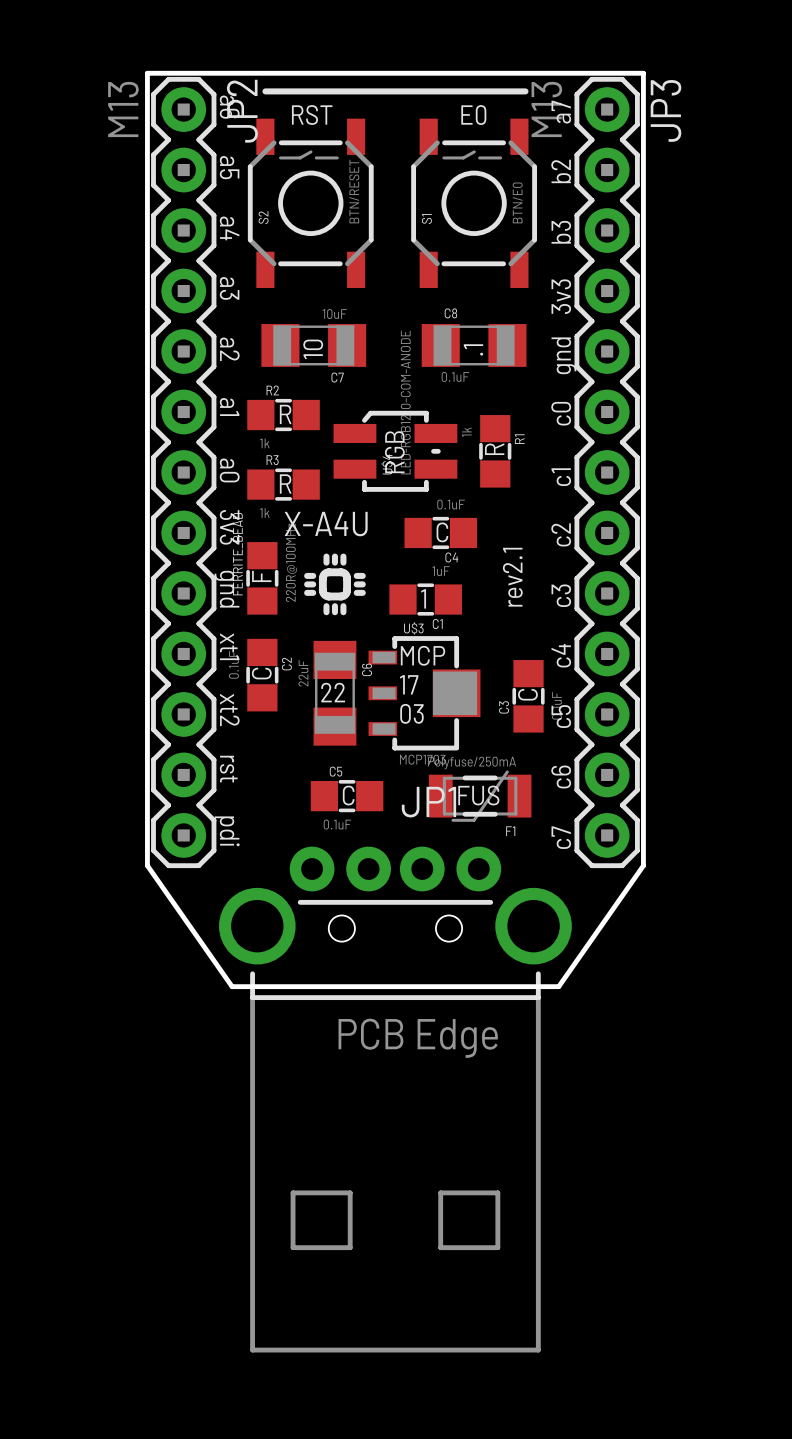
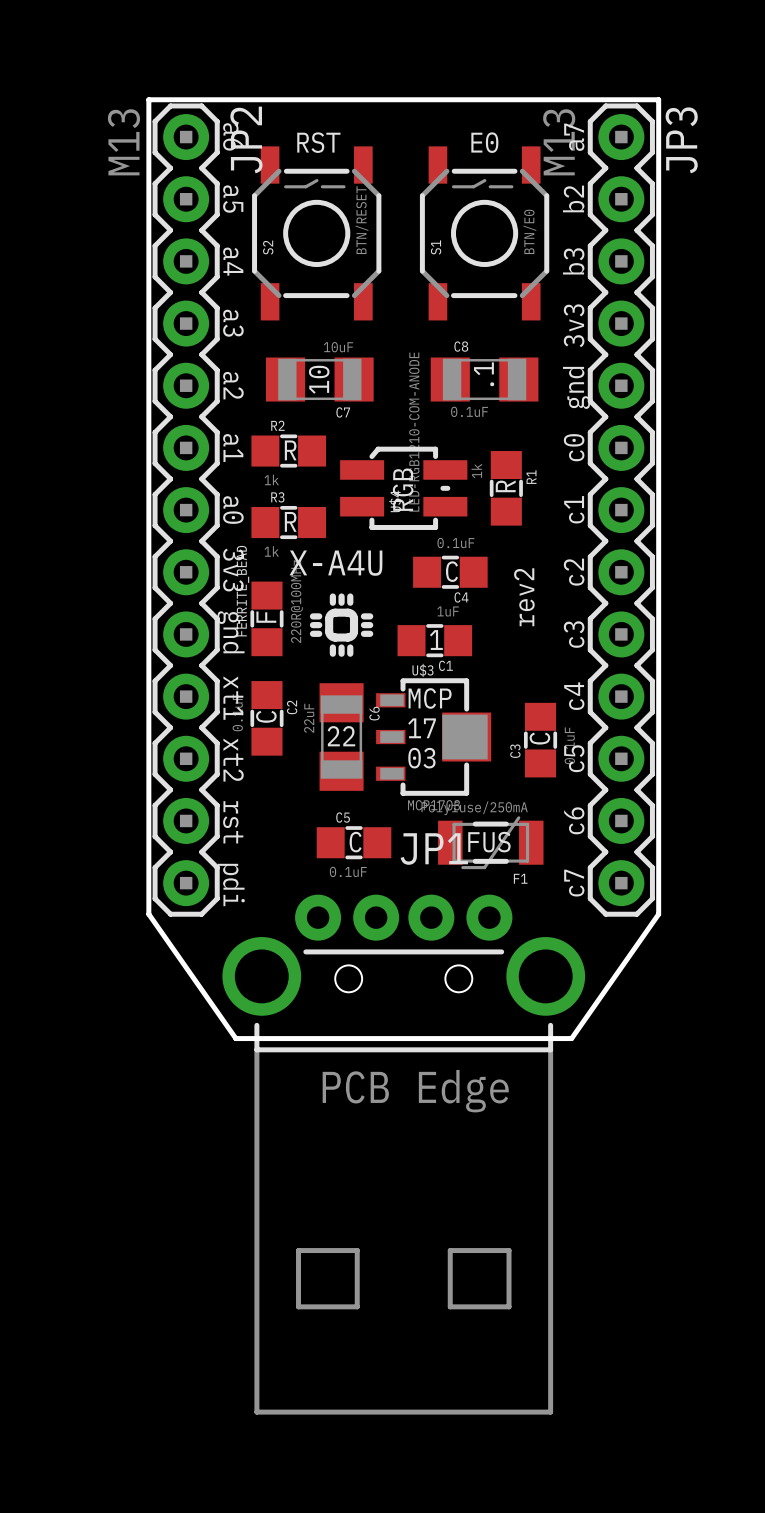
line: (265, 91) (525, 91) -> none
text: rev2.1 (512, 577) -> rev2 (524, 597)

